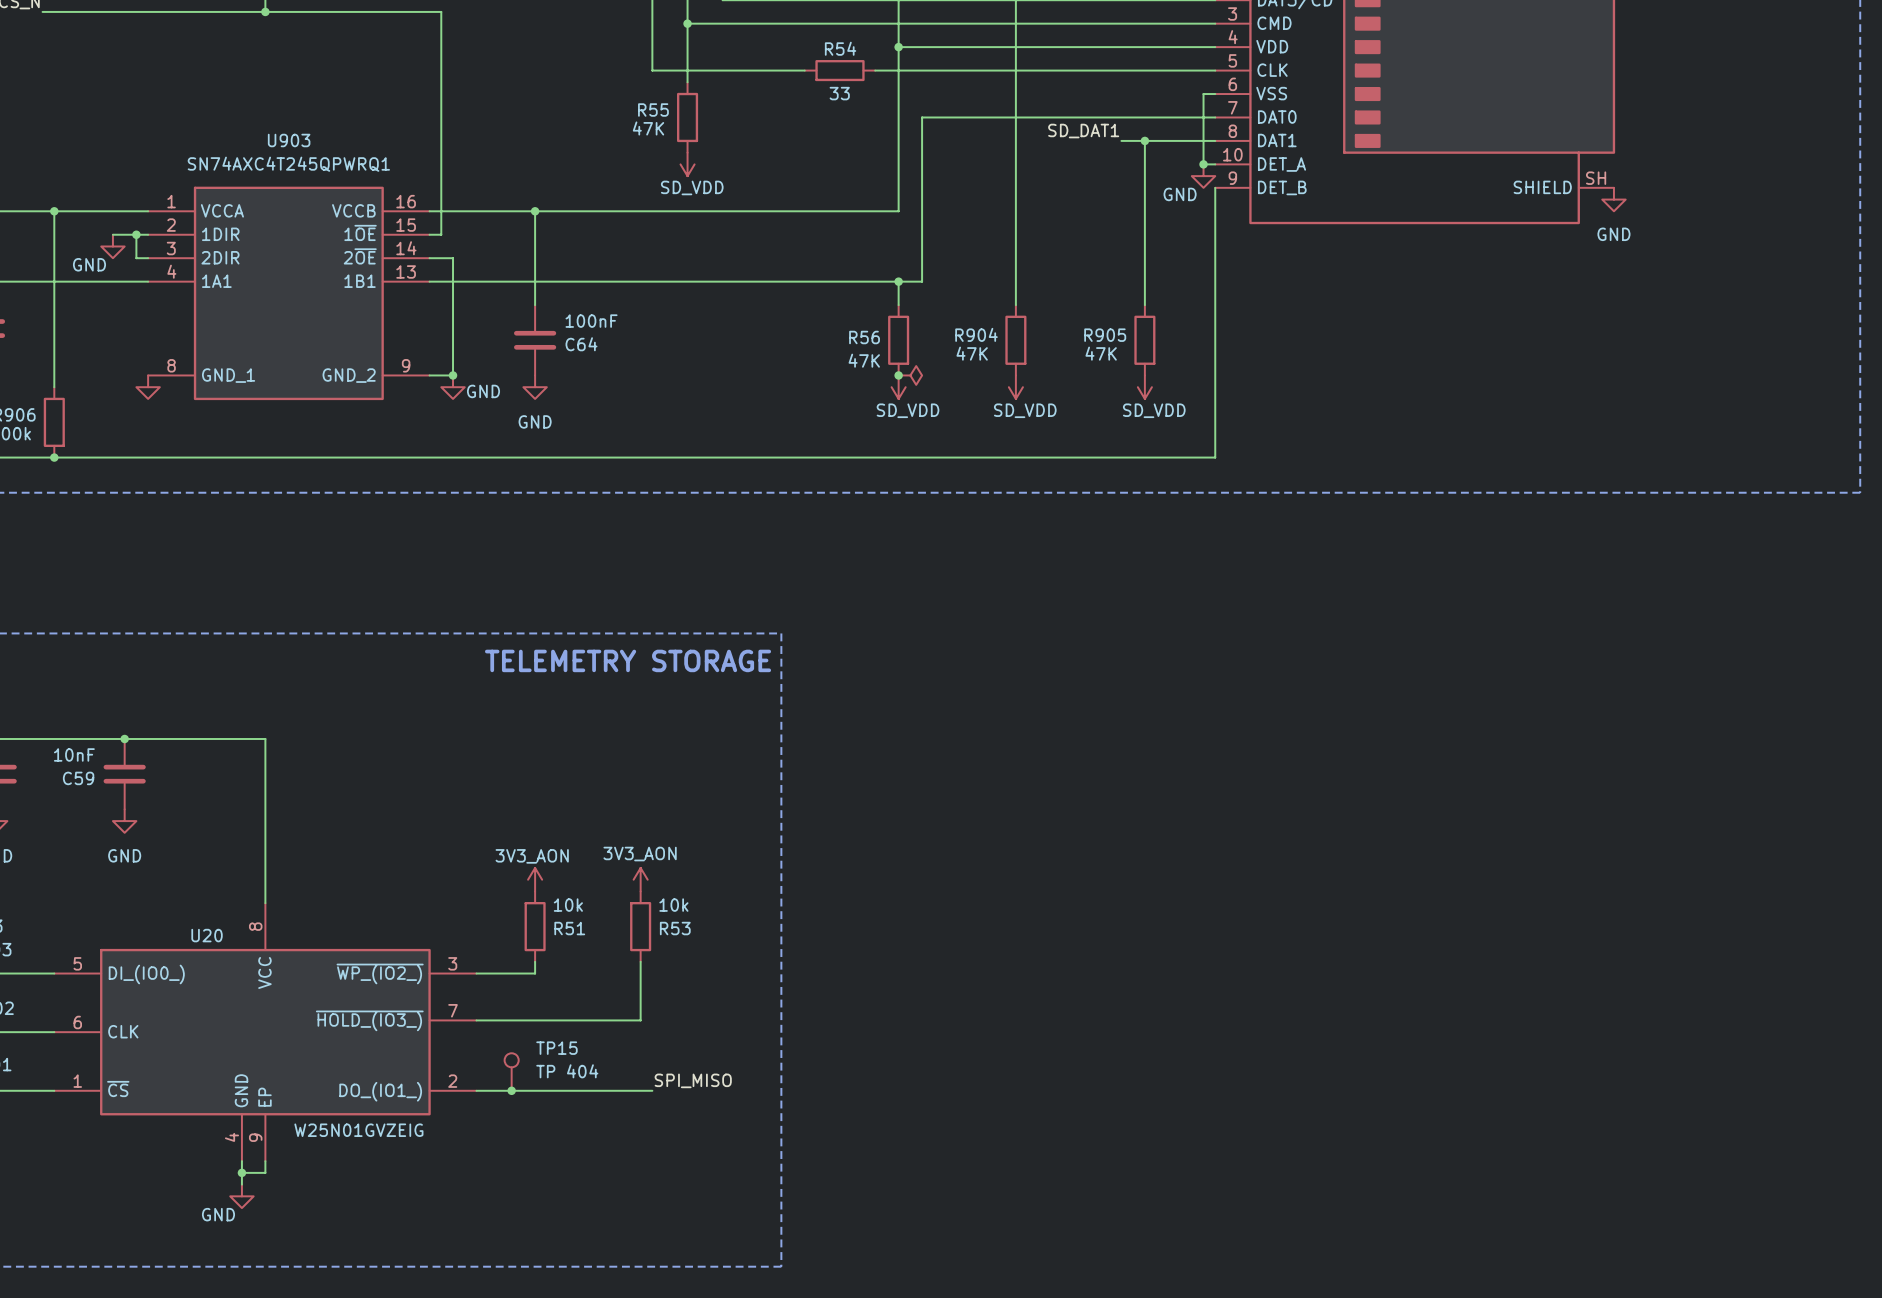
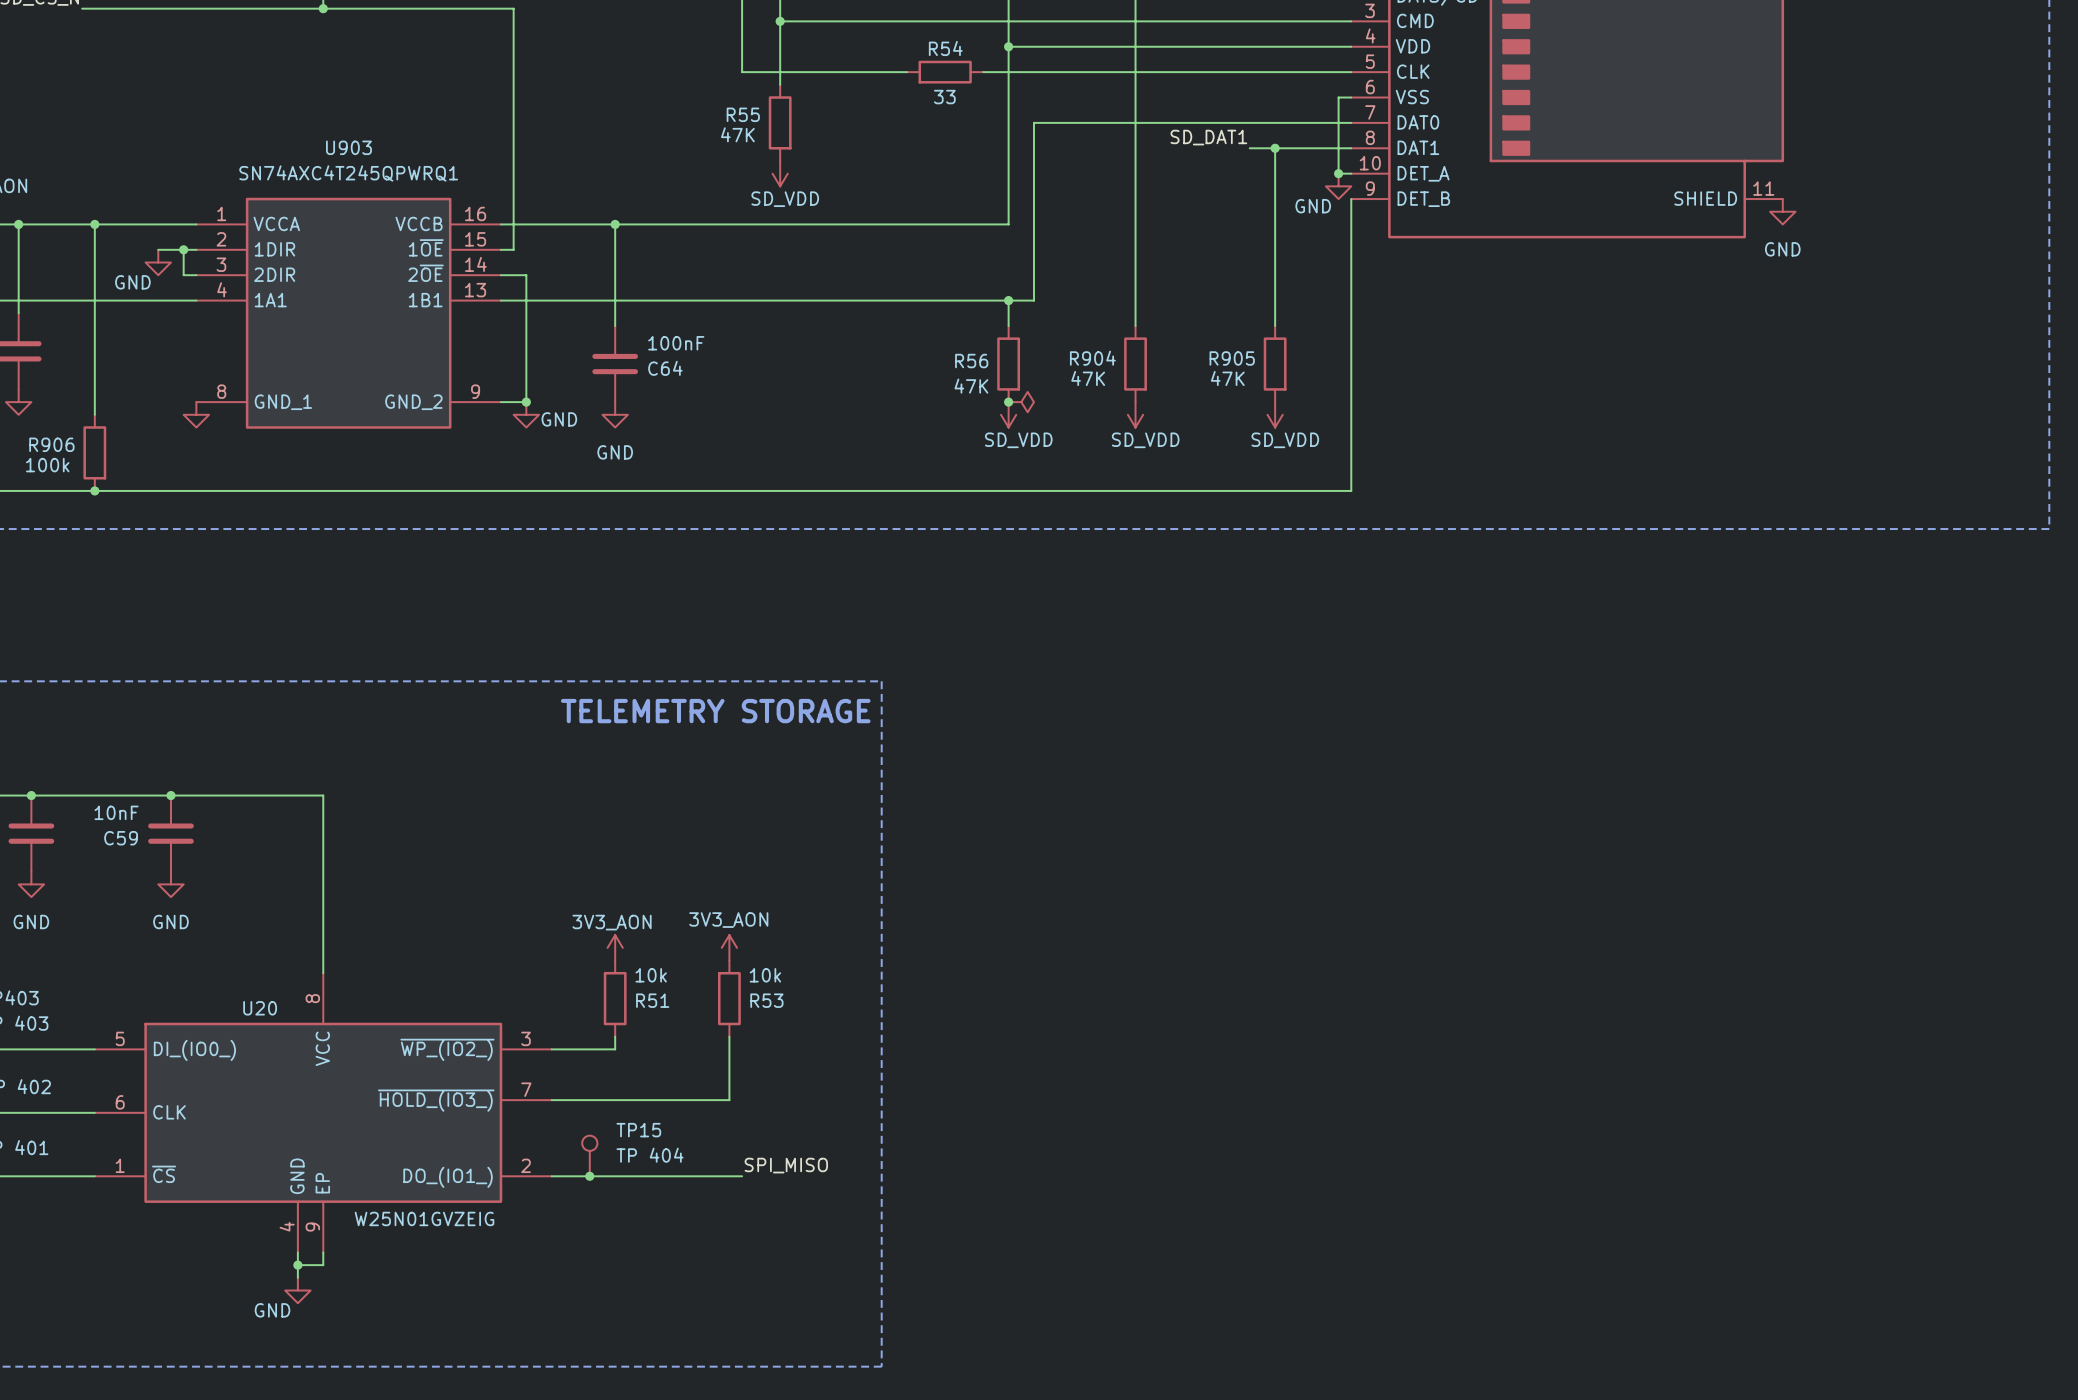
part pin number: SH (1596, 178) -> 11 (1763, 188)

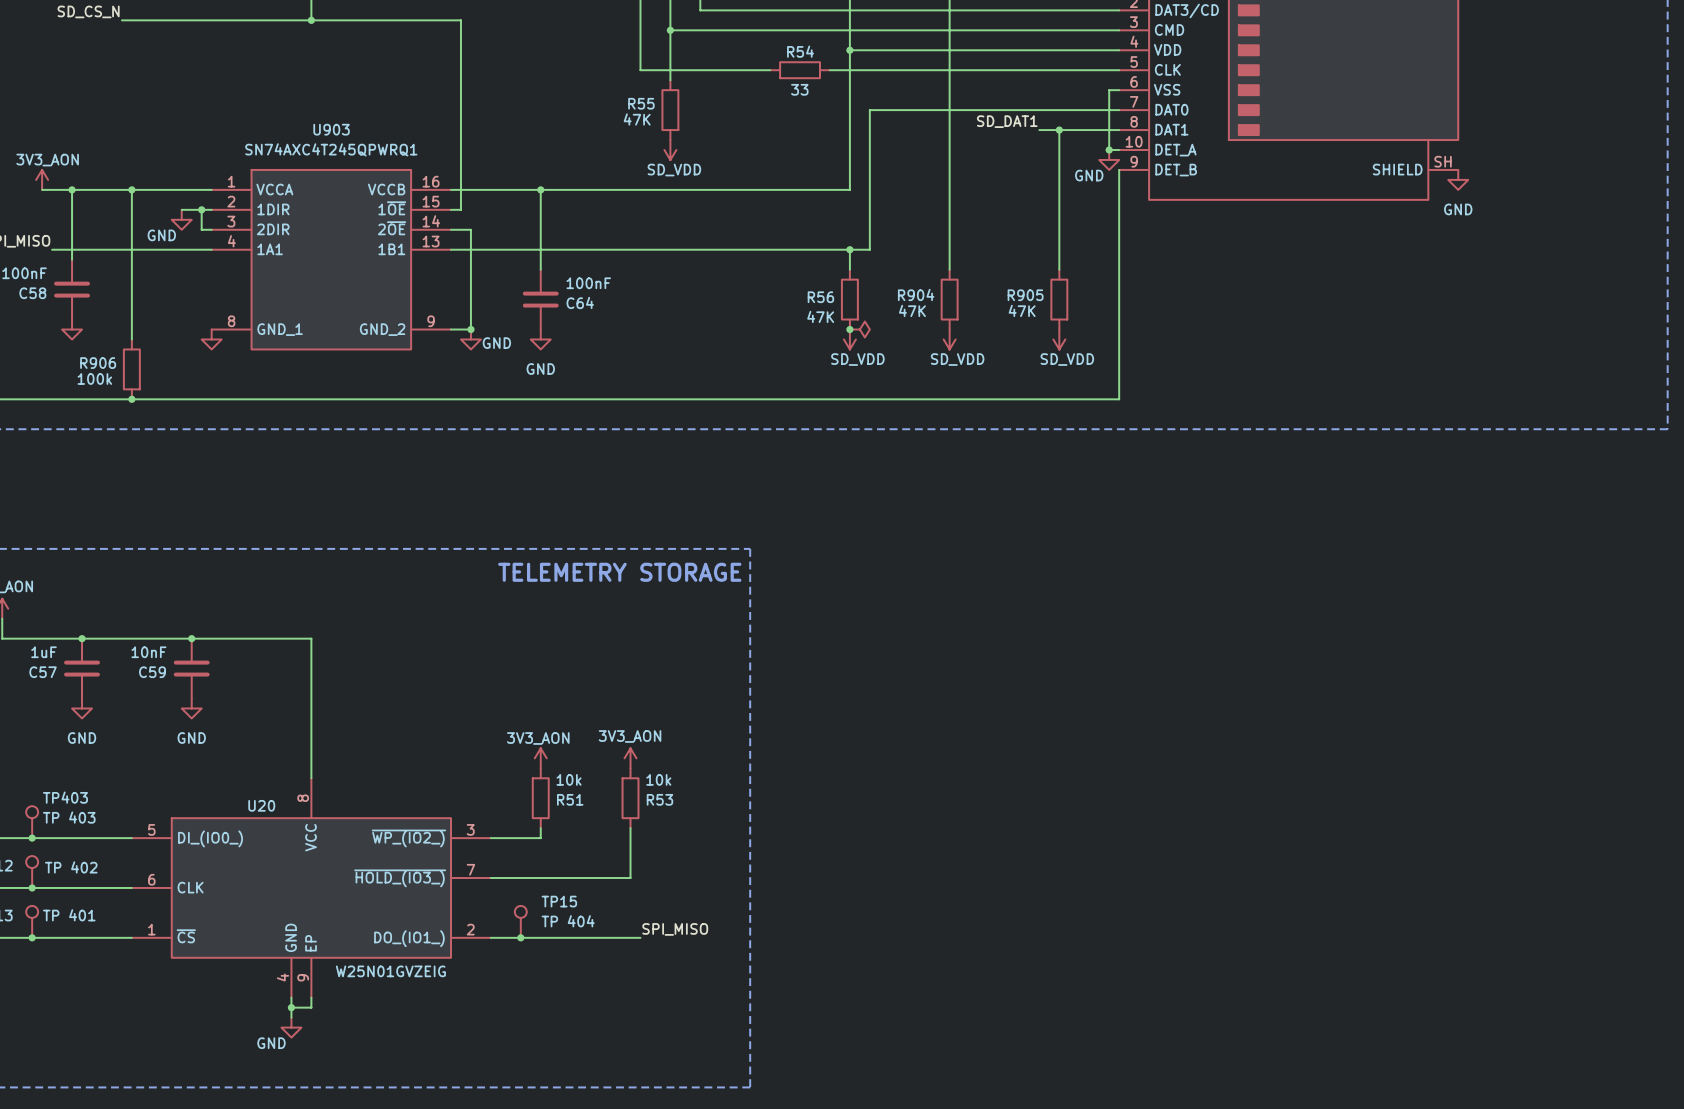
part pin number: 11 (1763, 188) -> SH (1443, 161)

